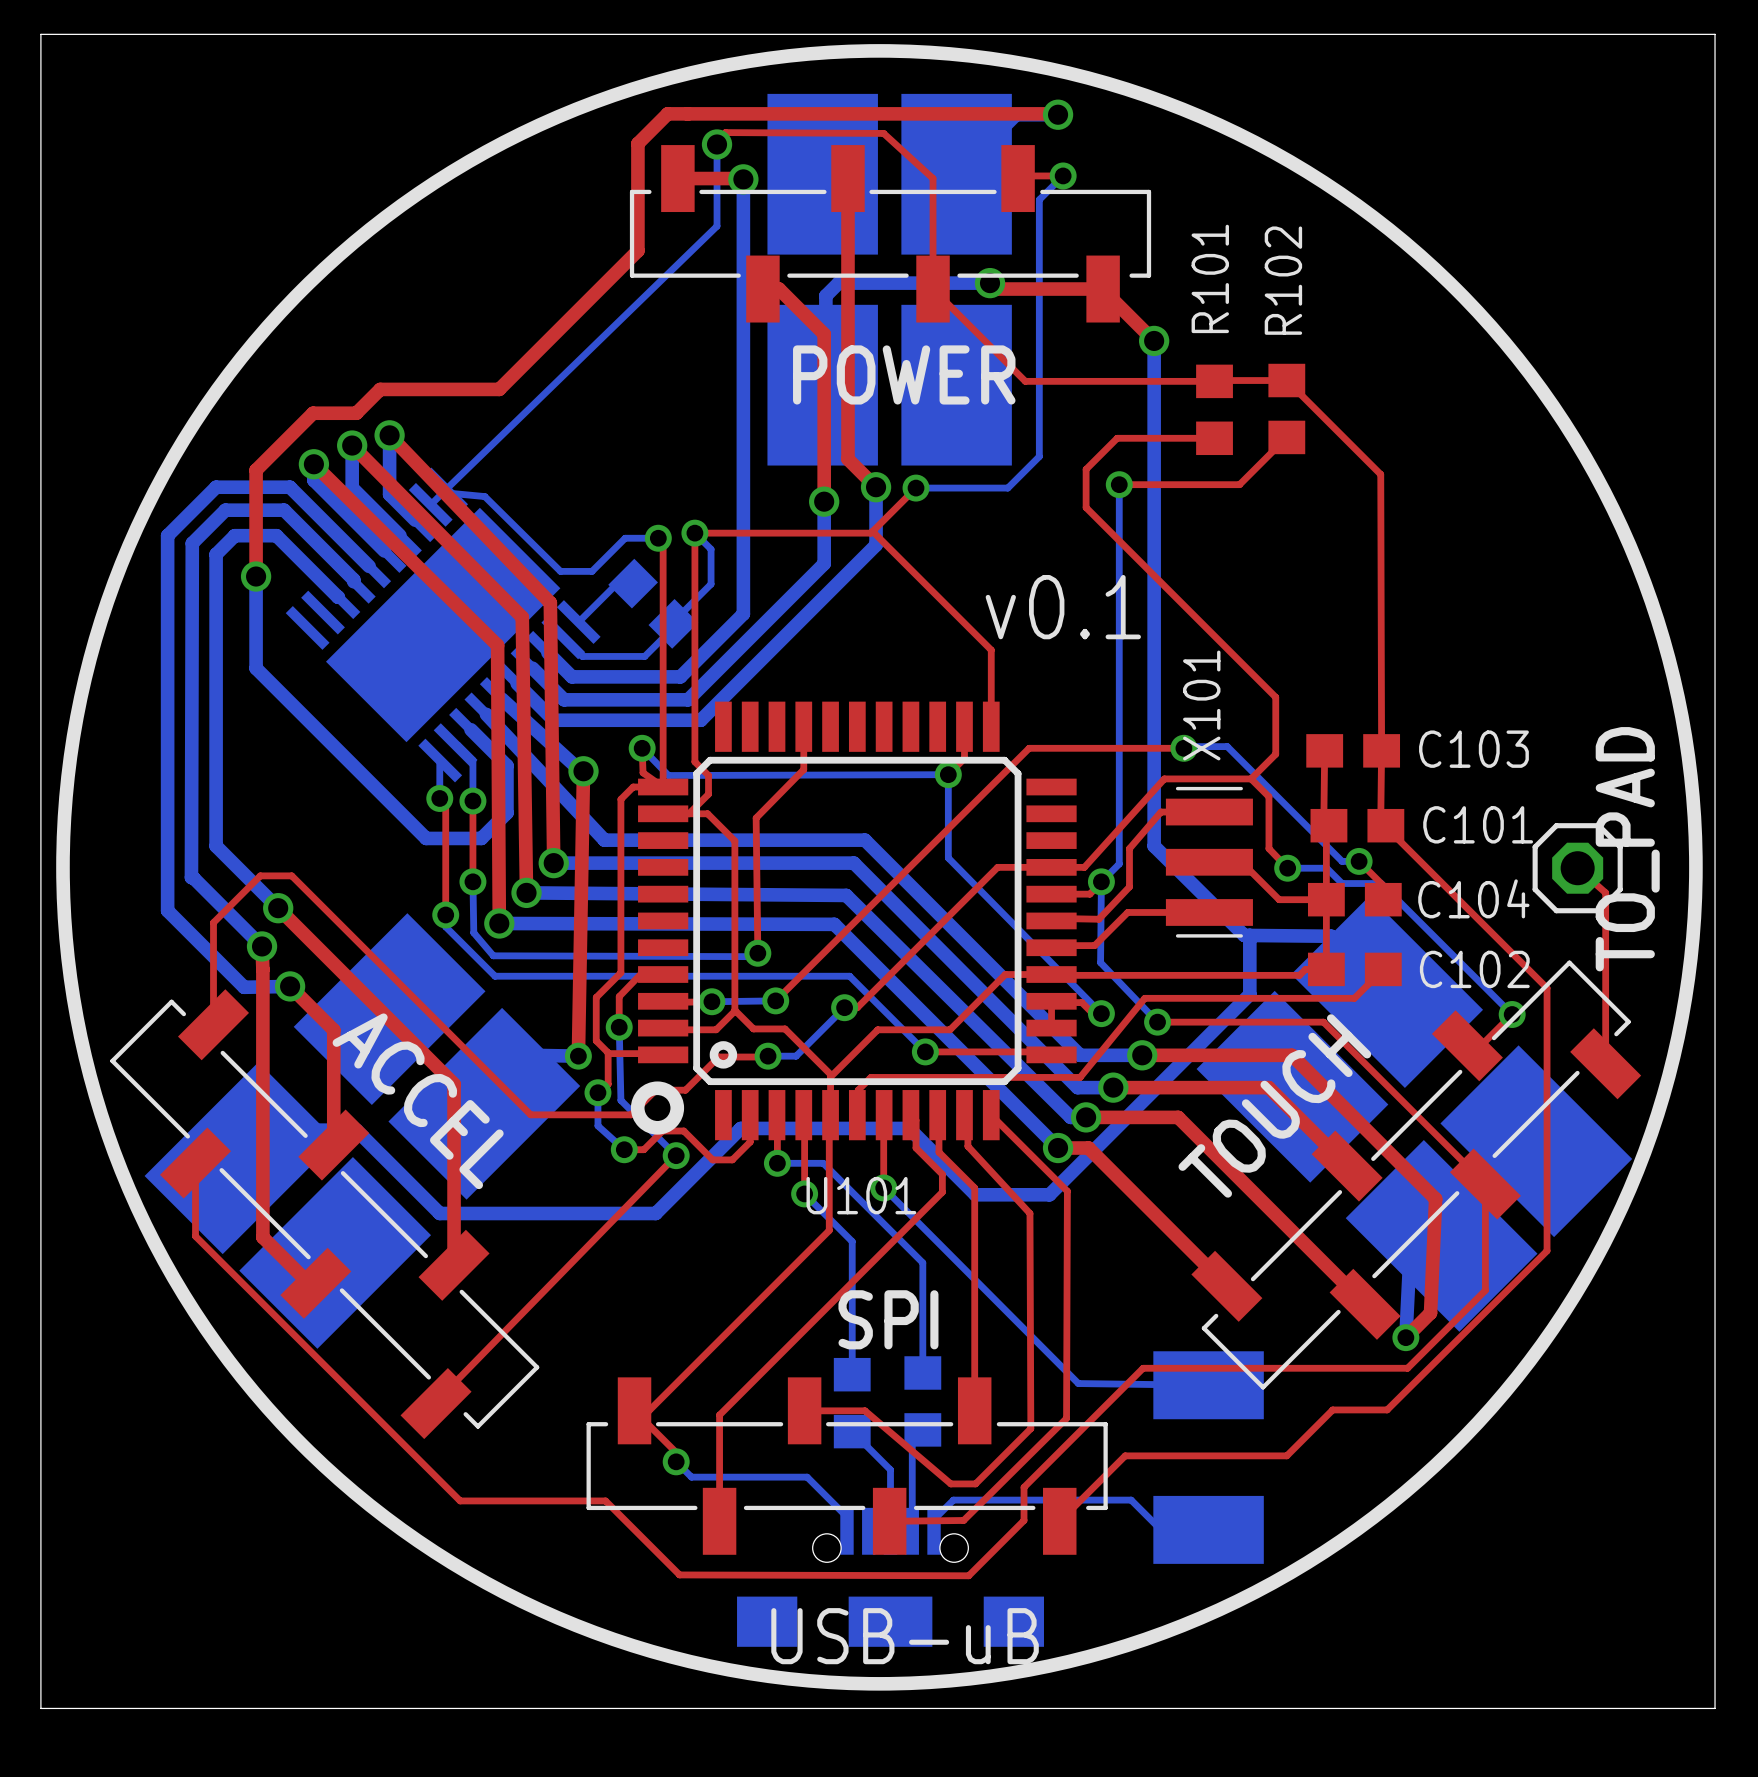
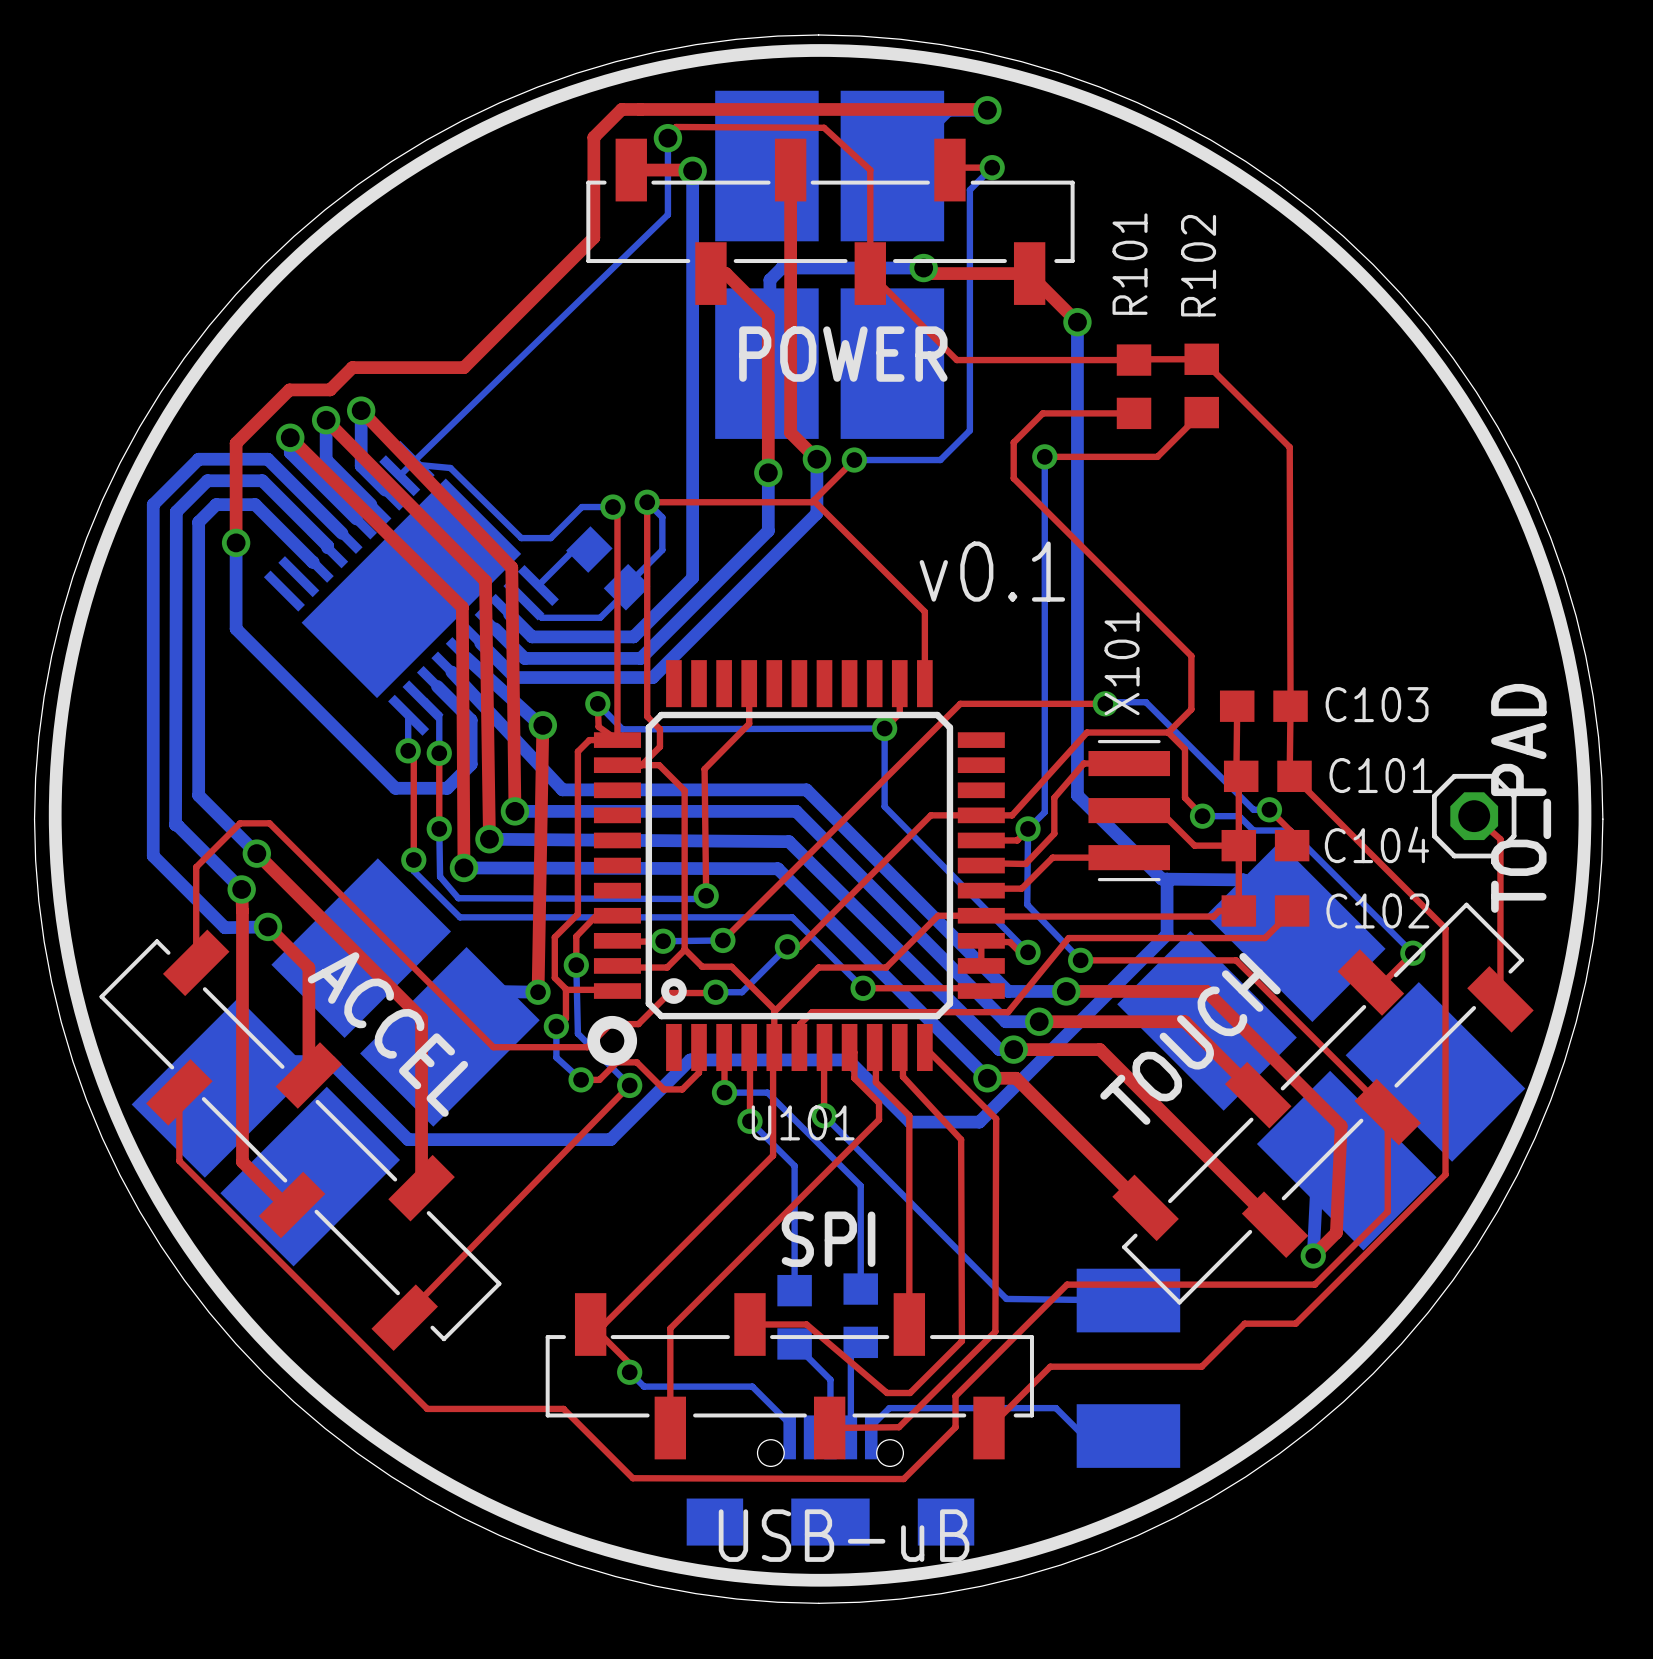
board edge: (40, 34) (1715, 34) (1715, 1708) (40, 1708) (40, 34) -> (818, 34) (736, 39) (655, 52) (576, 73) (537, 87) (462, 120) (391, 161) (325, 209) (264, 264) (209, 325) (161, 392) (120, 463) (86, 538) (72, 576) (51, 656) (38, 737) (34, 819) (38, 901) (51, 982) (72, 1061) (86, 1100) (120, 1175) (161, 1246) (209, 1312) (264, 1373) (325, 1428) (391, 1476) (462, 1517) (537, 1551) (576, 1564) (655, 1586) (736, 1599) (818, 1603) (900, 1599) (981, 1586) (1061, 1564) (1099, 1551) (1174, 1517) (1245, 1476) (1312, 1428) (1373, 1373) (1428, 1312) (1476, 1246) (1517, 1175) (1550, 1100) (1564, 1061) (1585, 982) (1598, 901) (1602, 819) (1598, 737) (1585, 656) (1564, 576) (1550, 538) (1517, 463) (1476, 392) (1428, 325) (1373, 264) (1312, 209) (1245, 161) (1174, 120) (1099, 87) (1061, 73) (981, 52) (900, 39) (818, 34)

